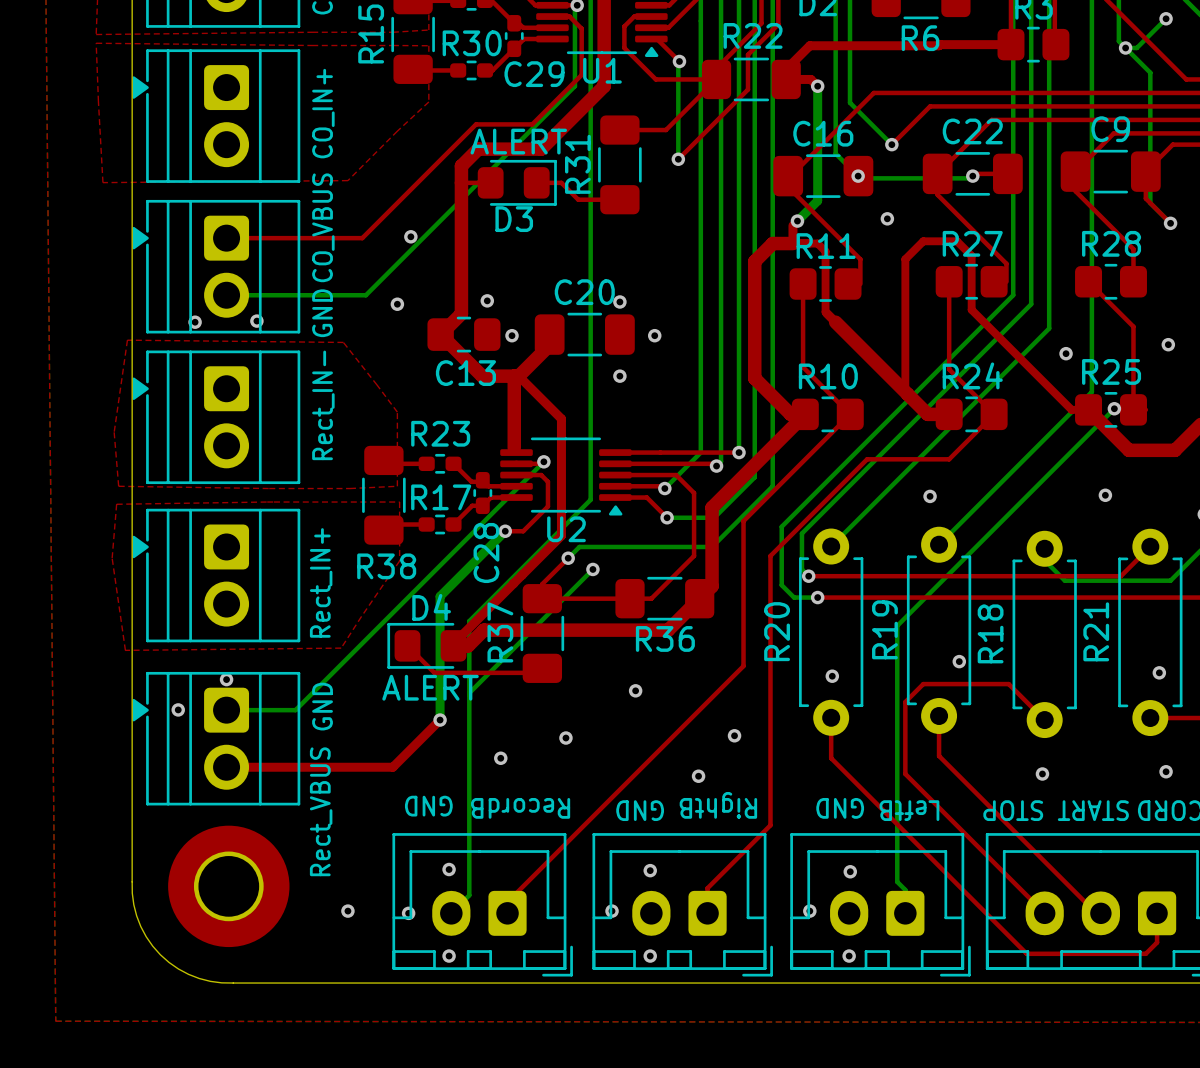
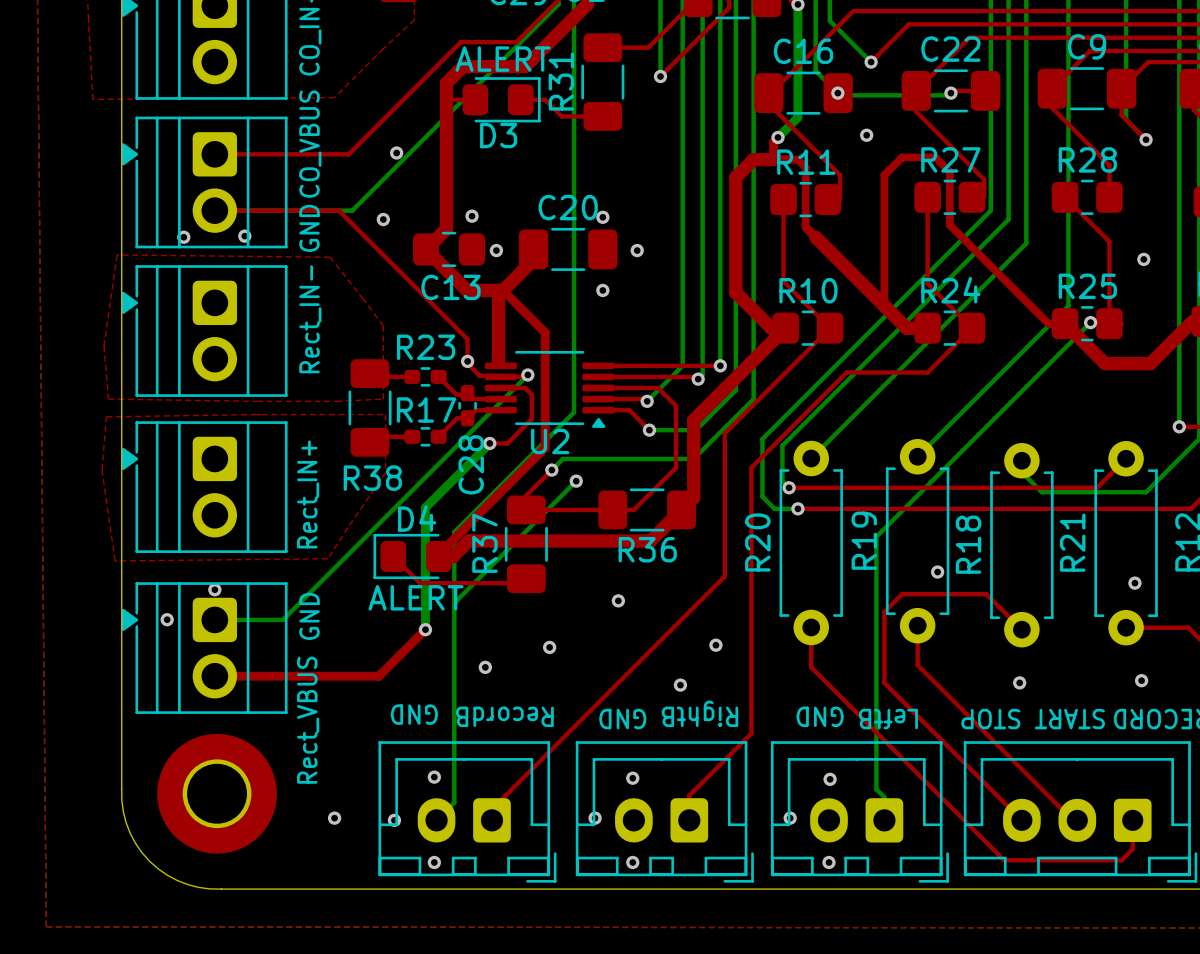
top track: none -> (214, 210) (339, 210) (467, 339) (467, 363) (479, 375) (500, 375)
via: (1066, 353) -> none
via: none -> (467, 361)
via: (1105, 495) -> none
via: (930, 496) -> none
via: (832, 676) -> none

